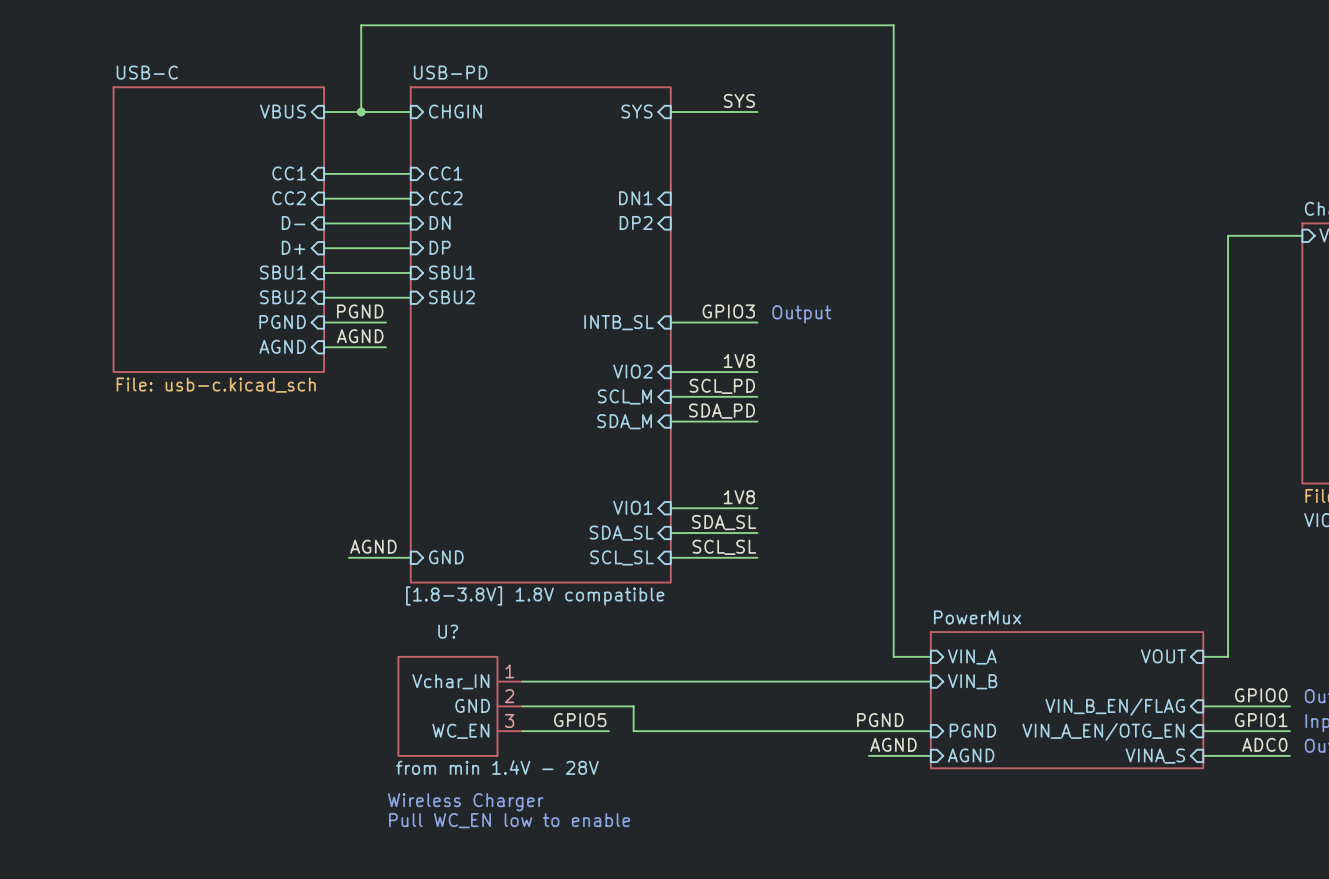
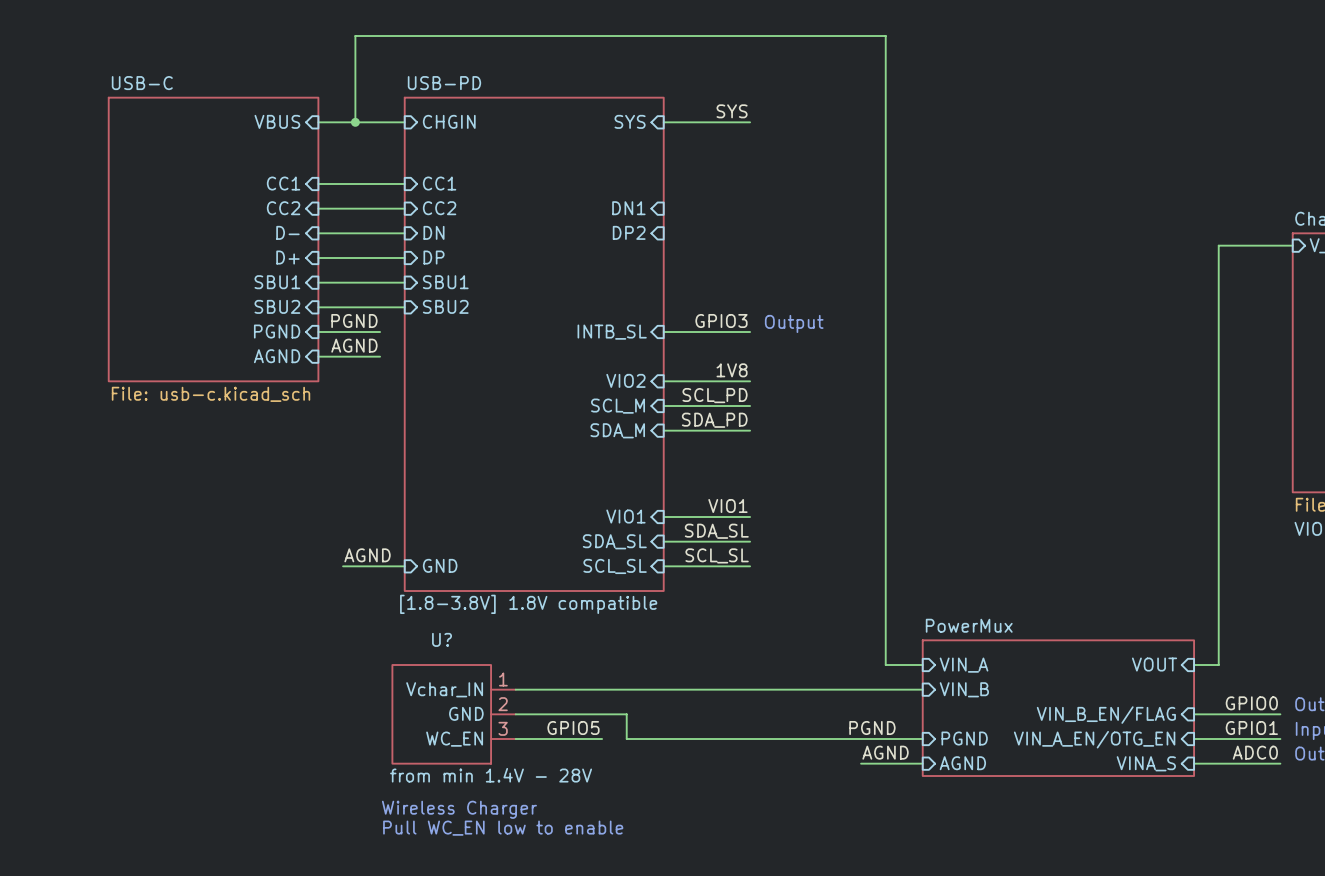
label: 1V8 (739, 497) -> VIO1 (727, 505)

